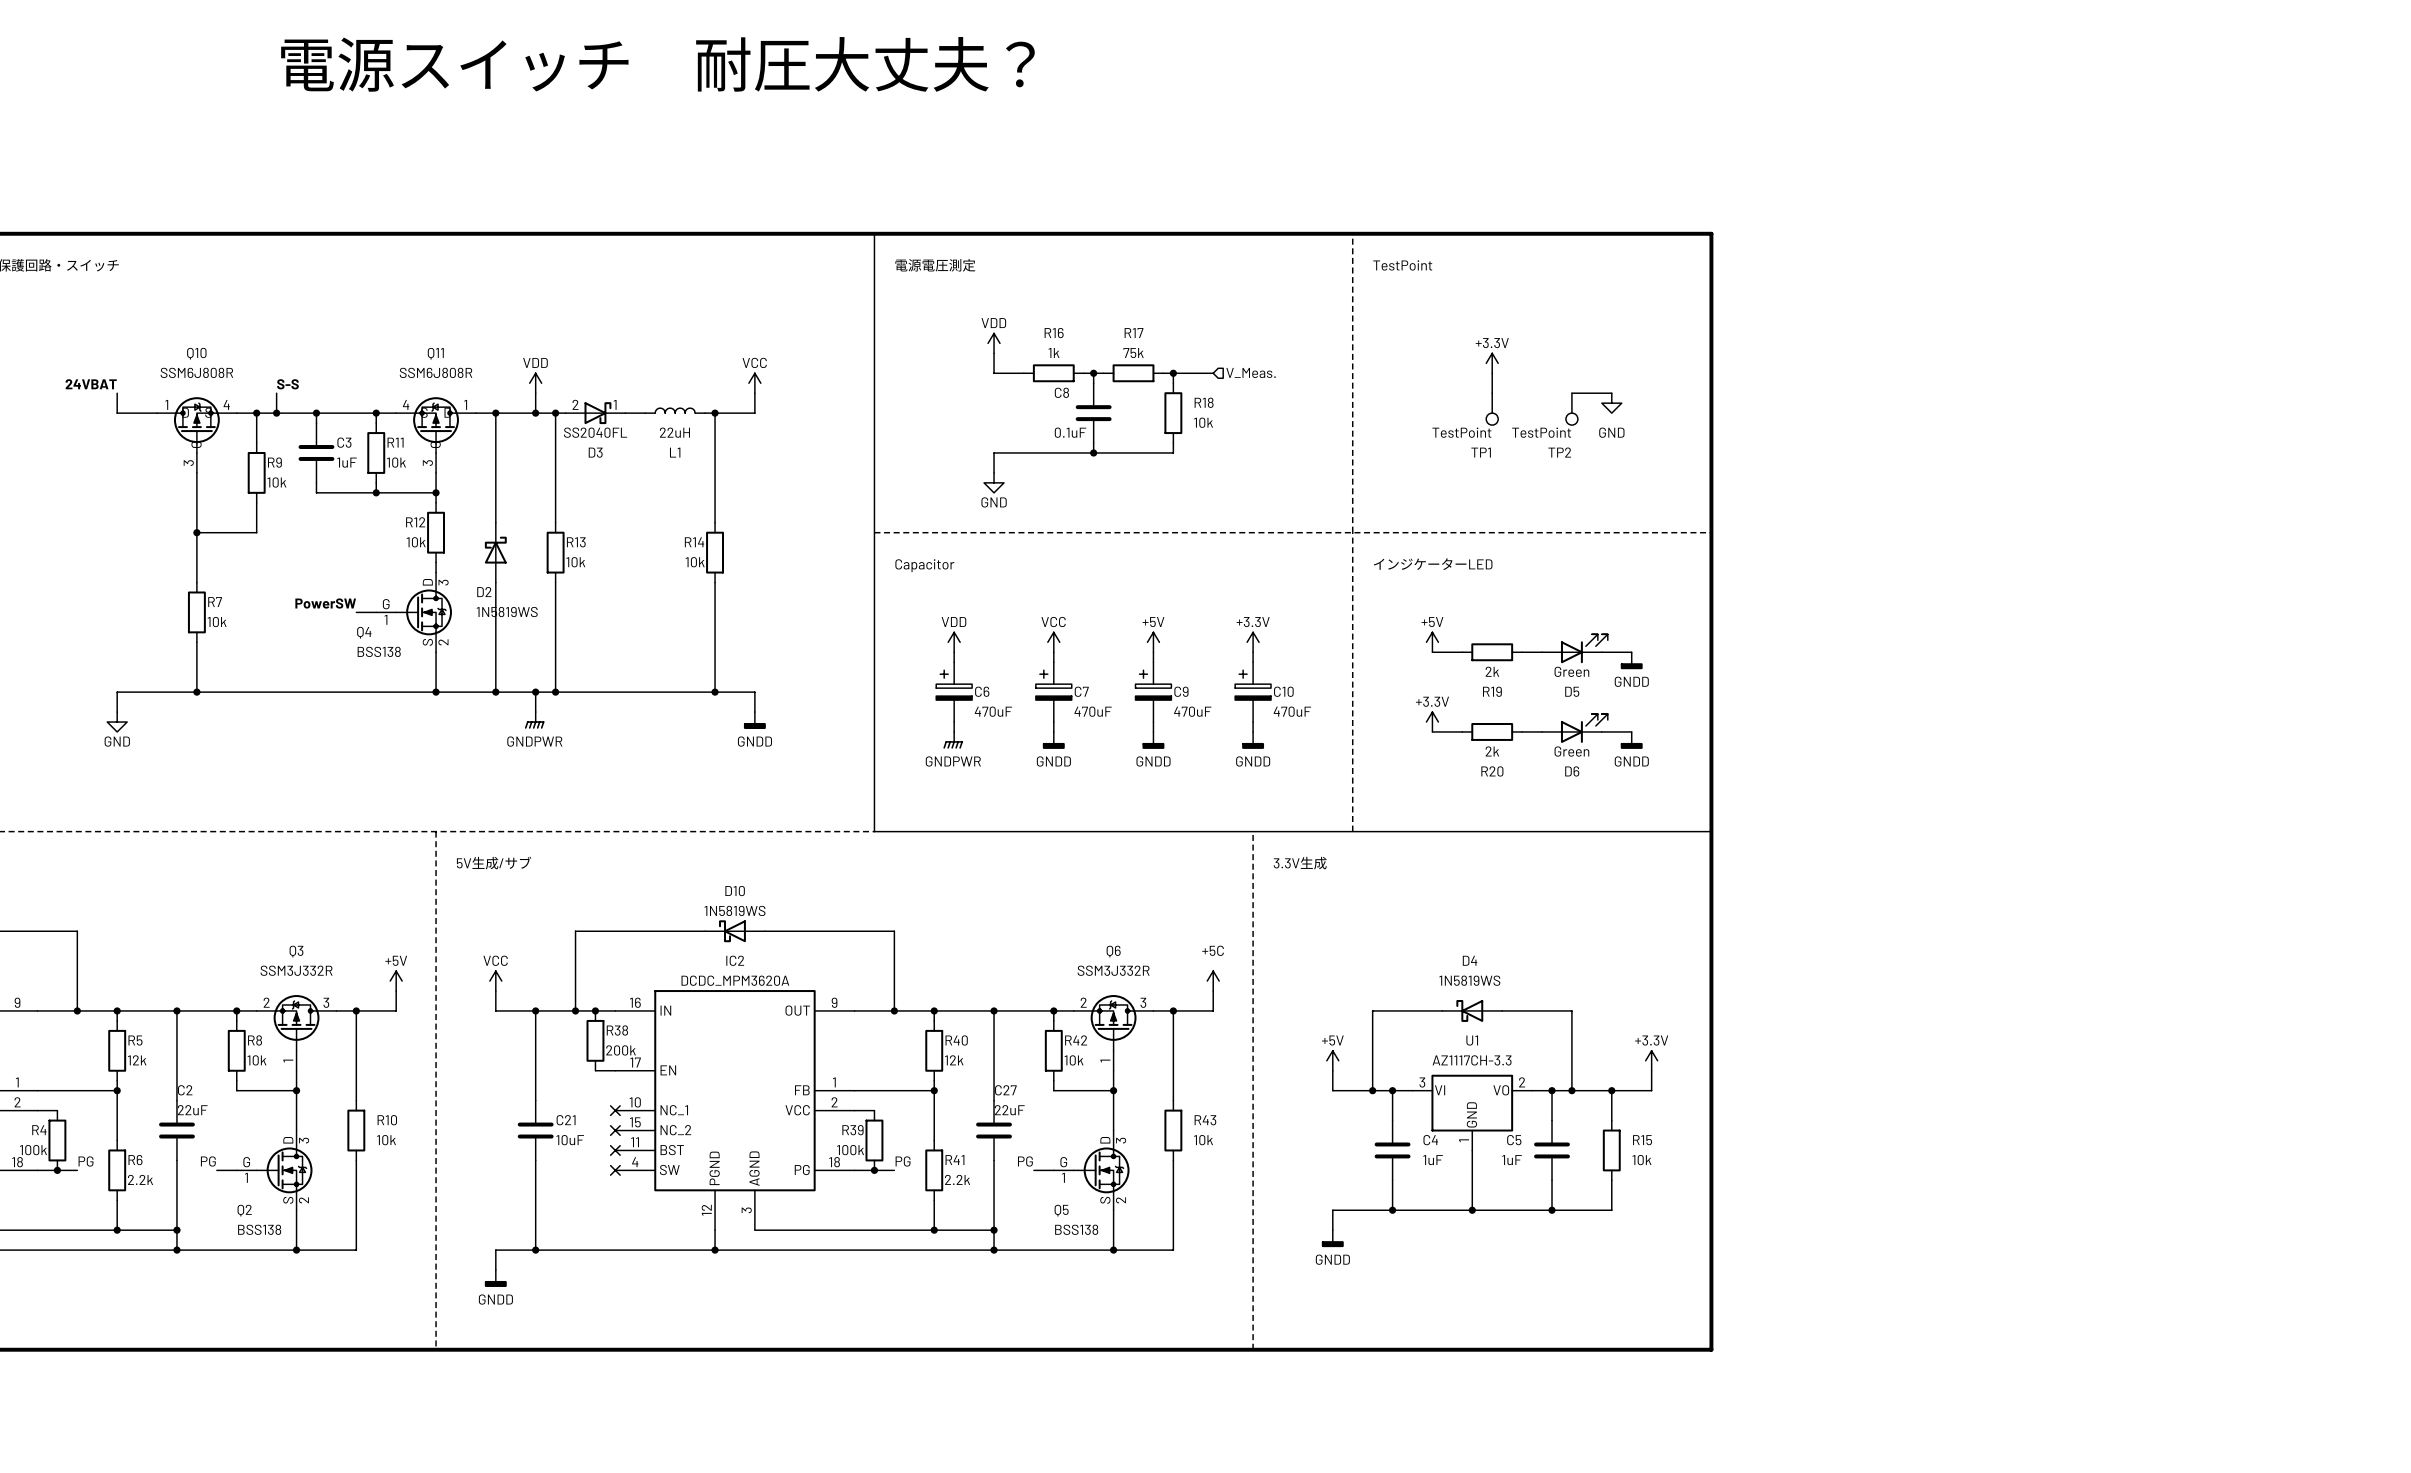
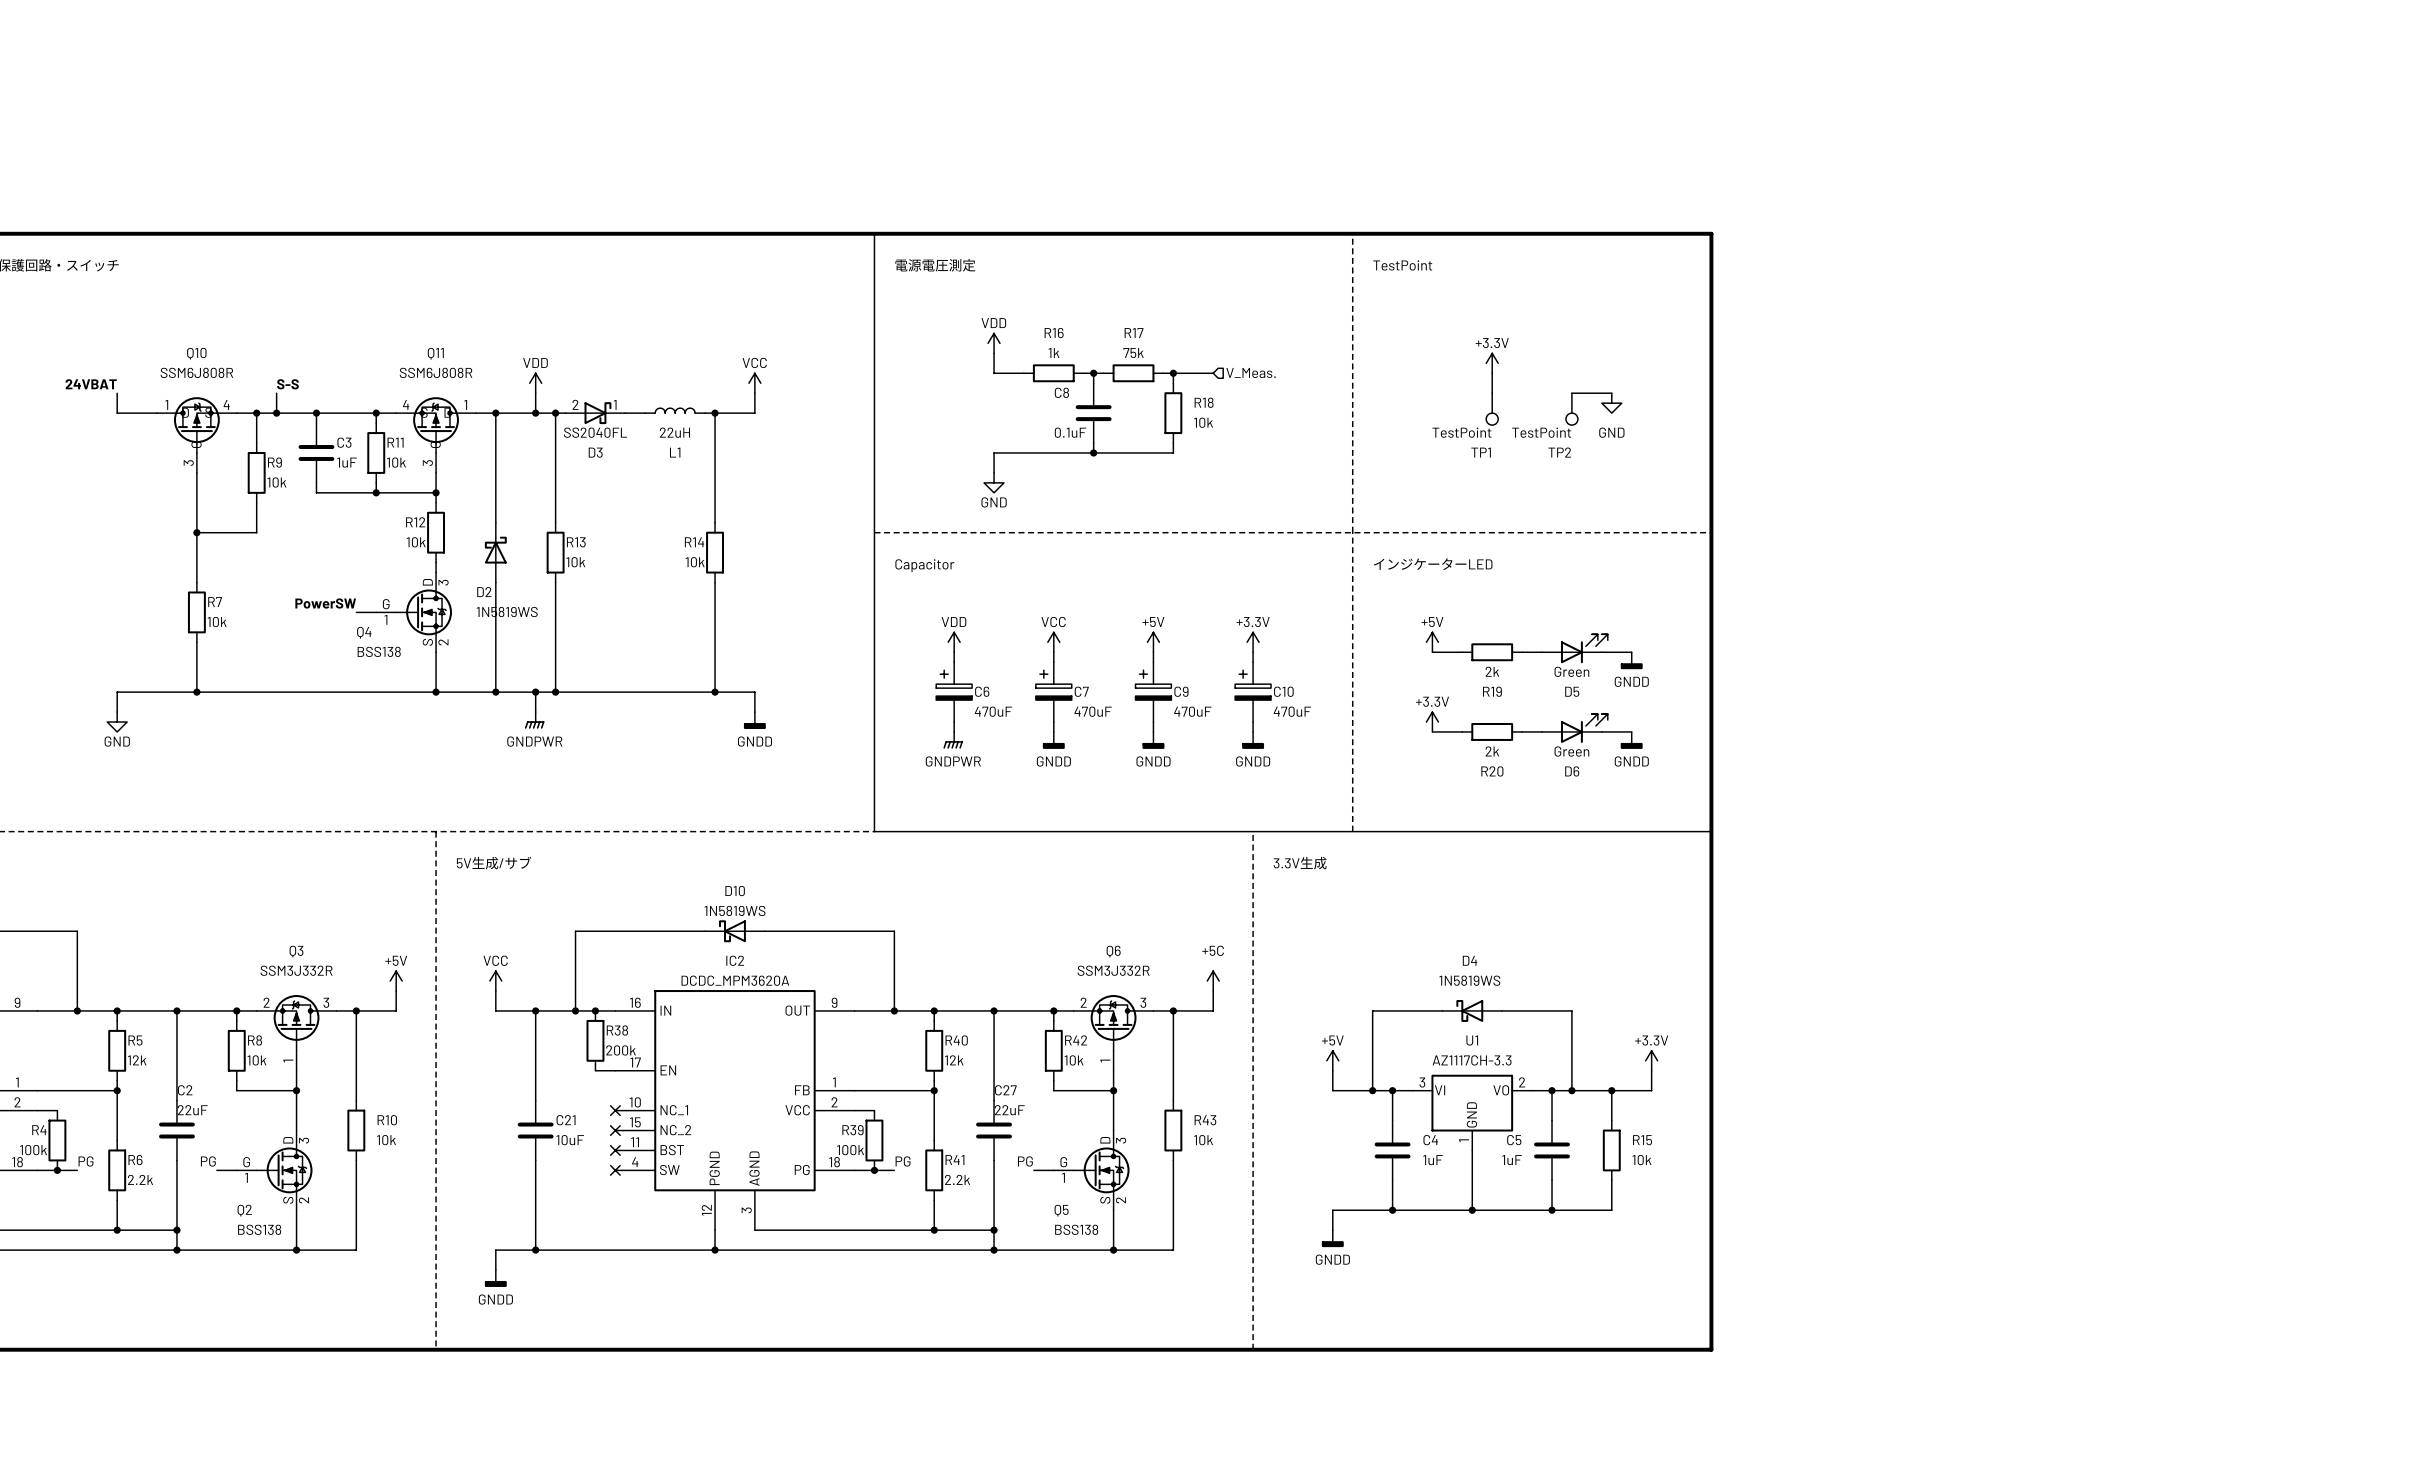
text: 電源スイッチ 耐圧大丈夫？ (657, 64) -> none

